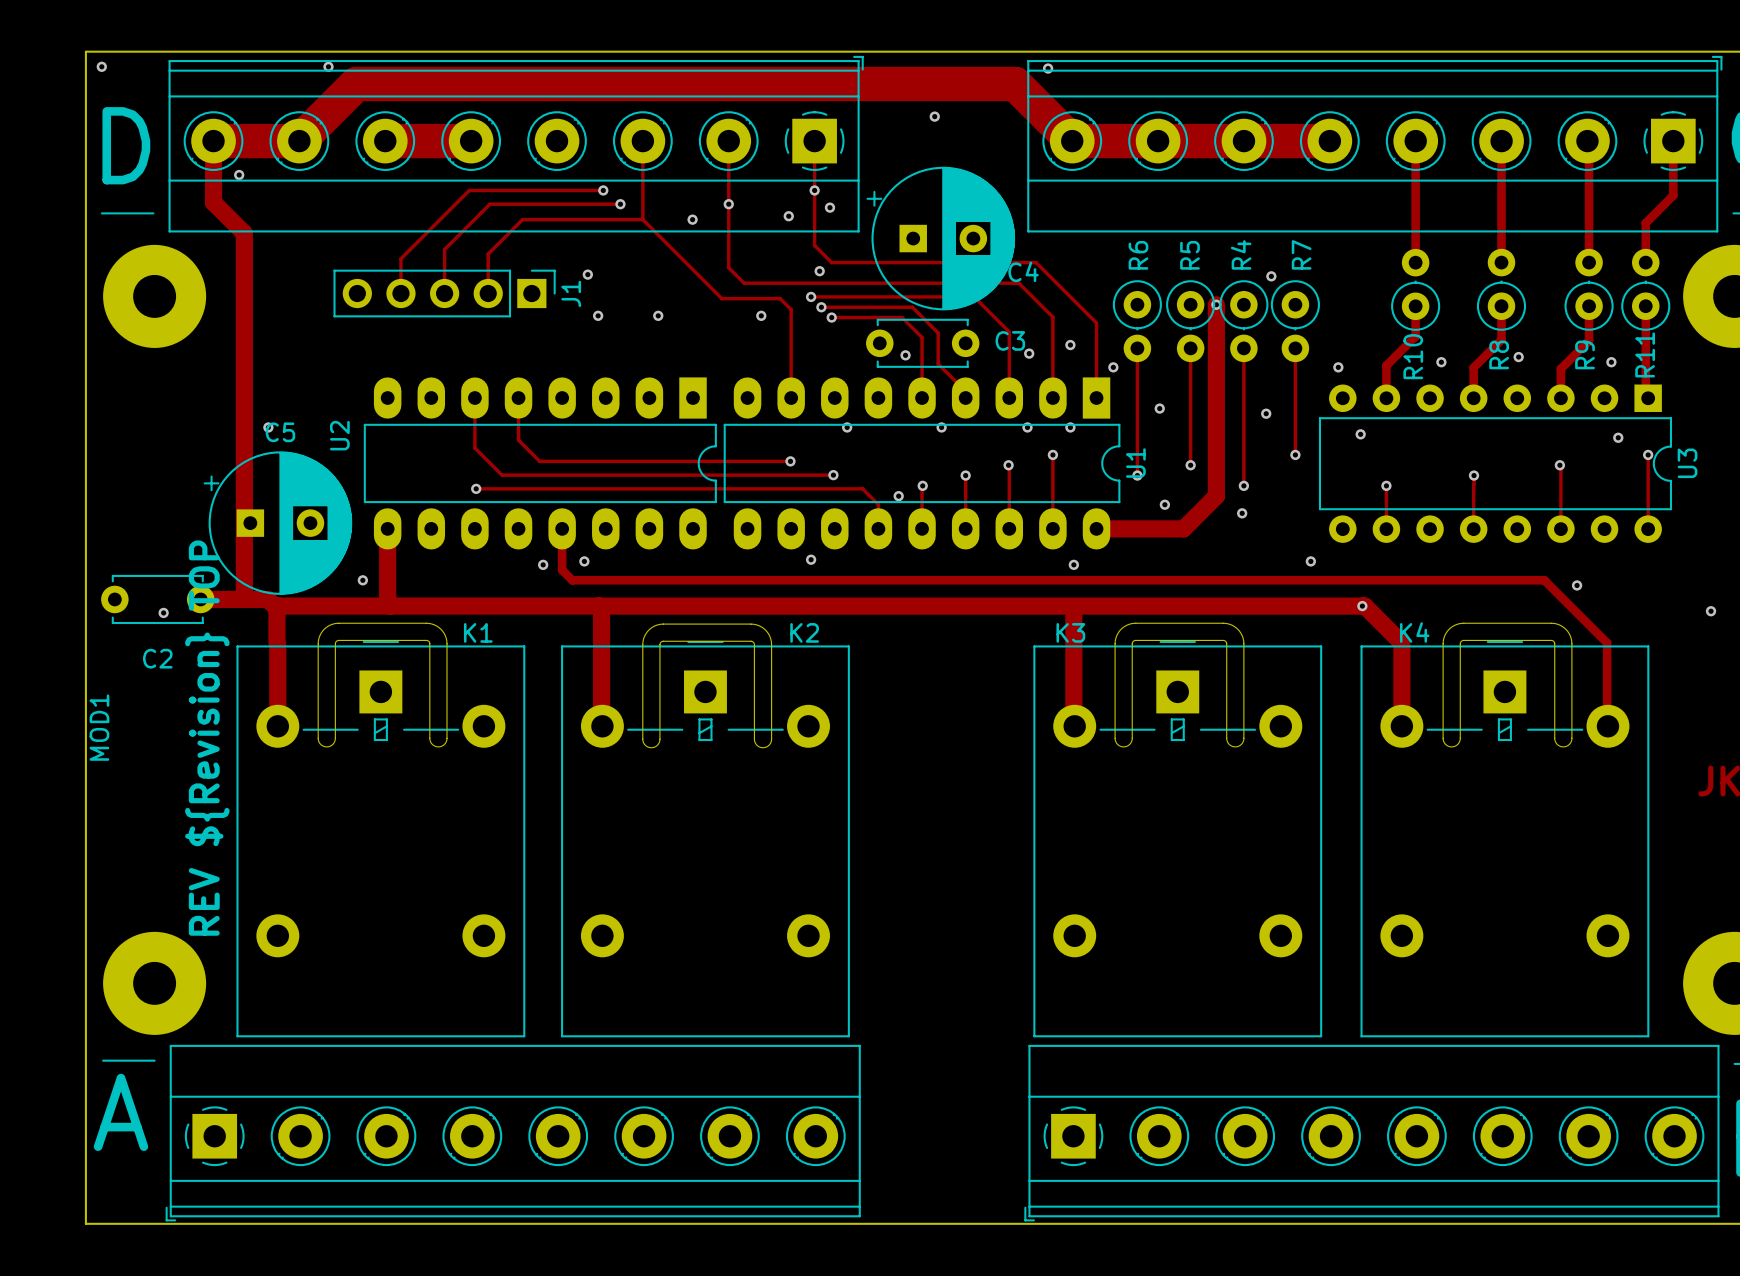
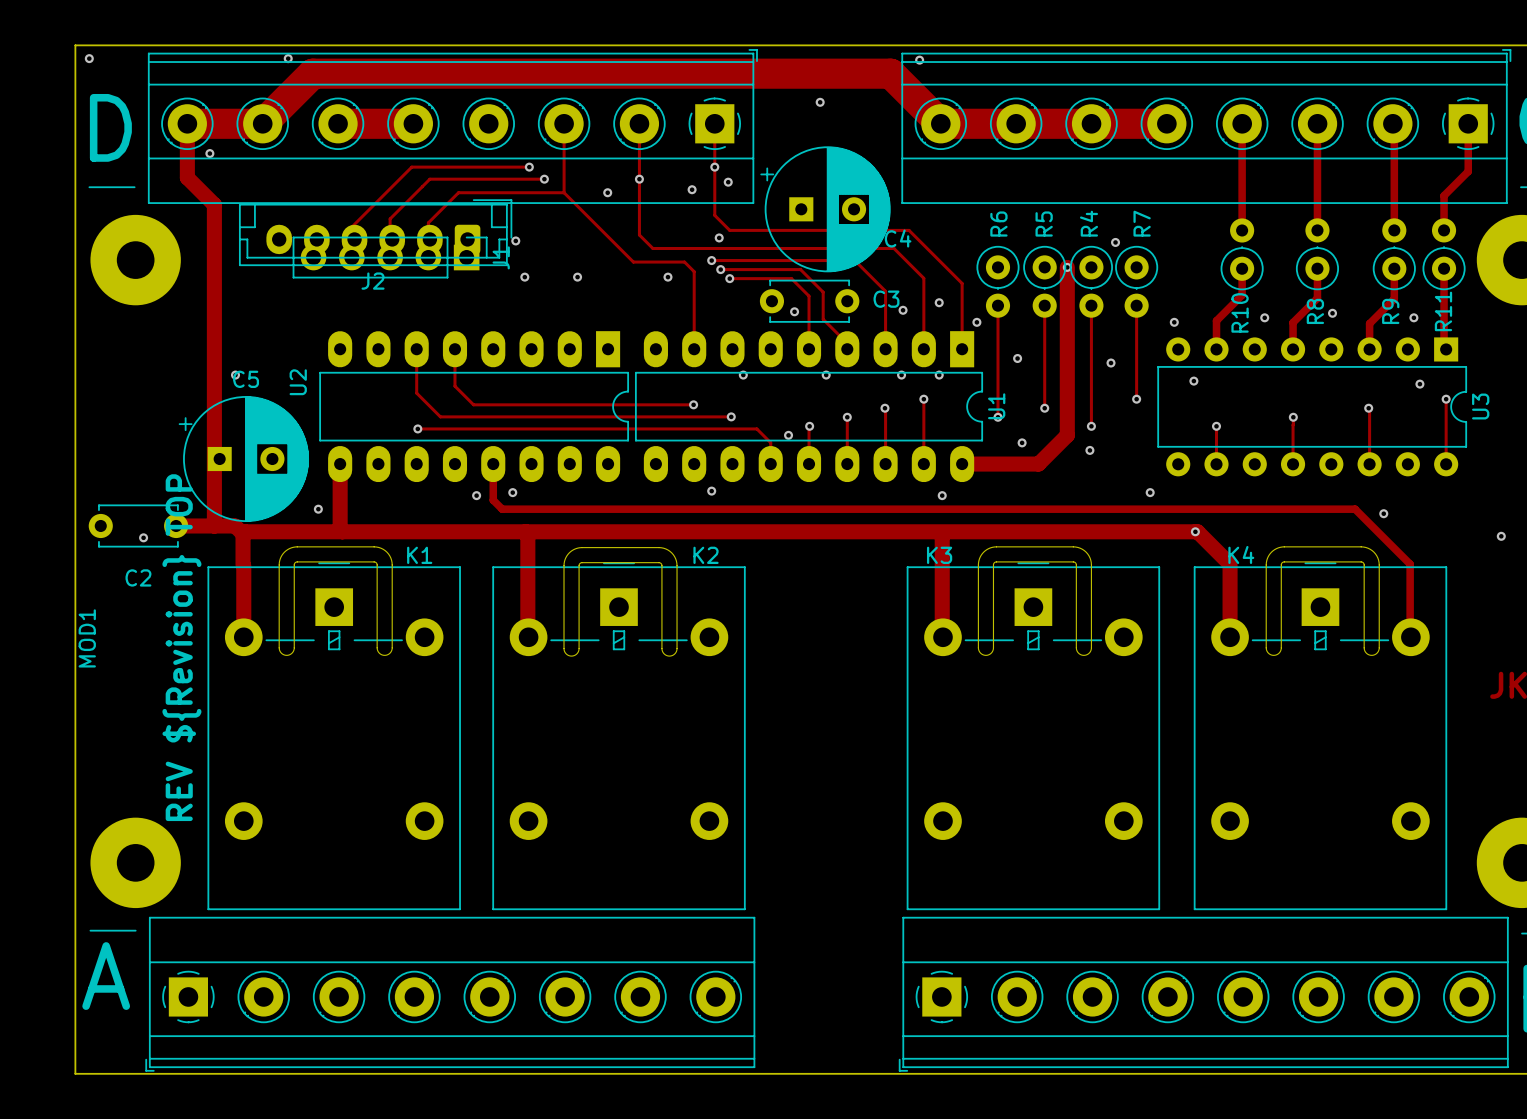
J2: none -> (375, 232)

